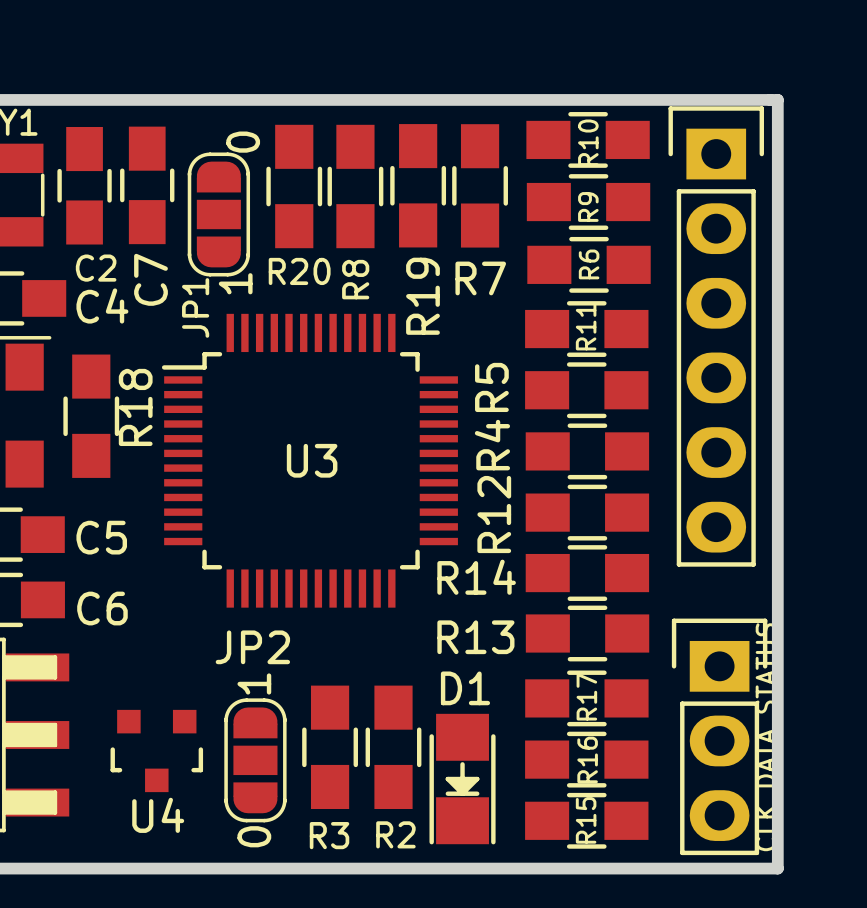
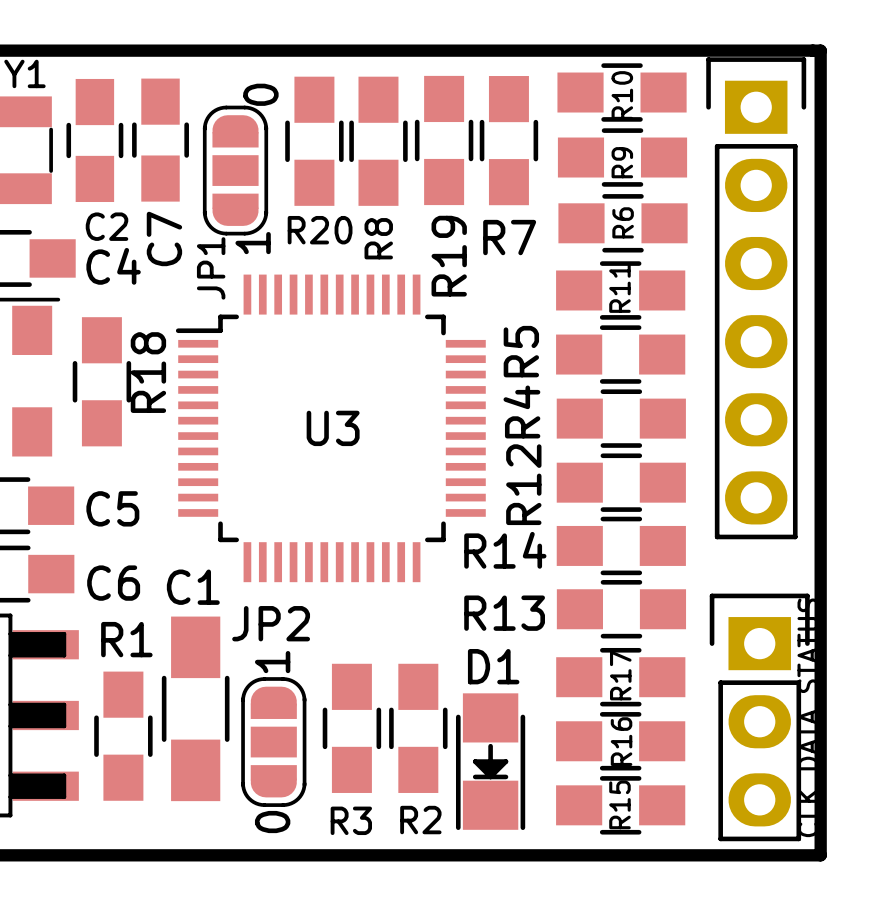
C1: none -> (195, 708)
U4: (156, 751) -> none
R1: none -> (123, 736)

